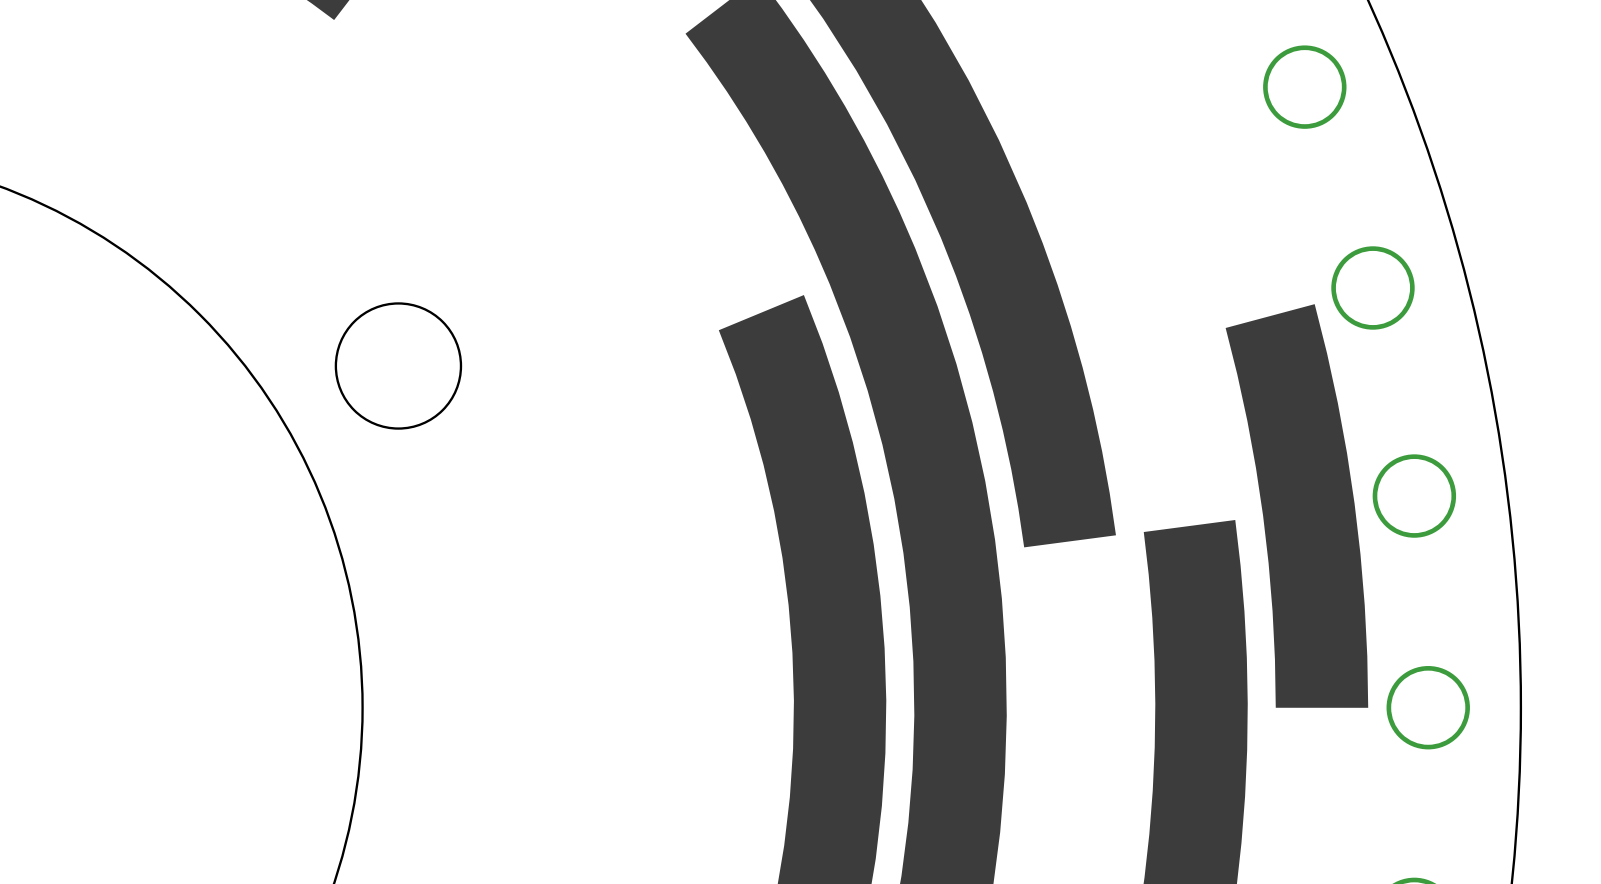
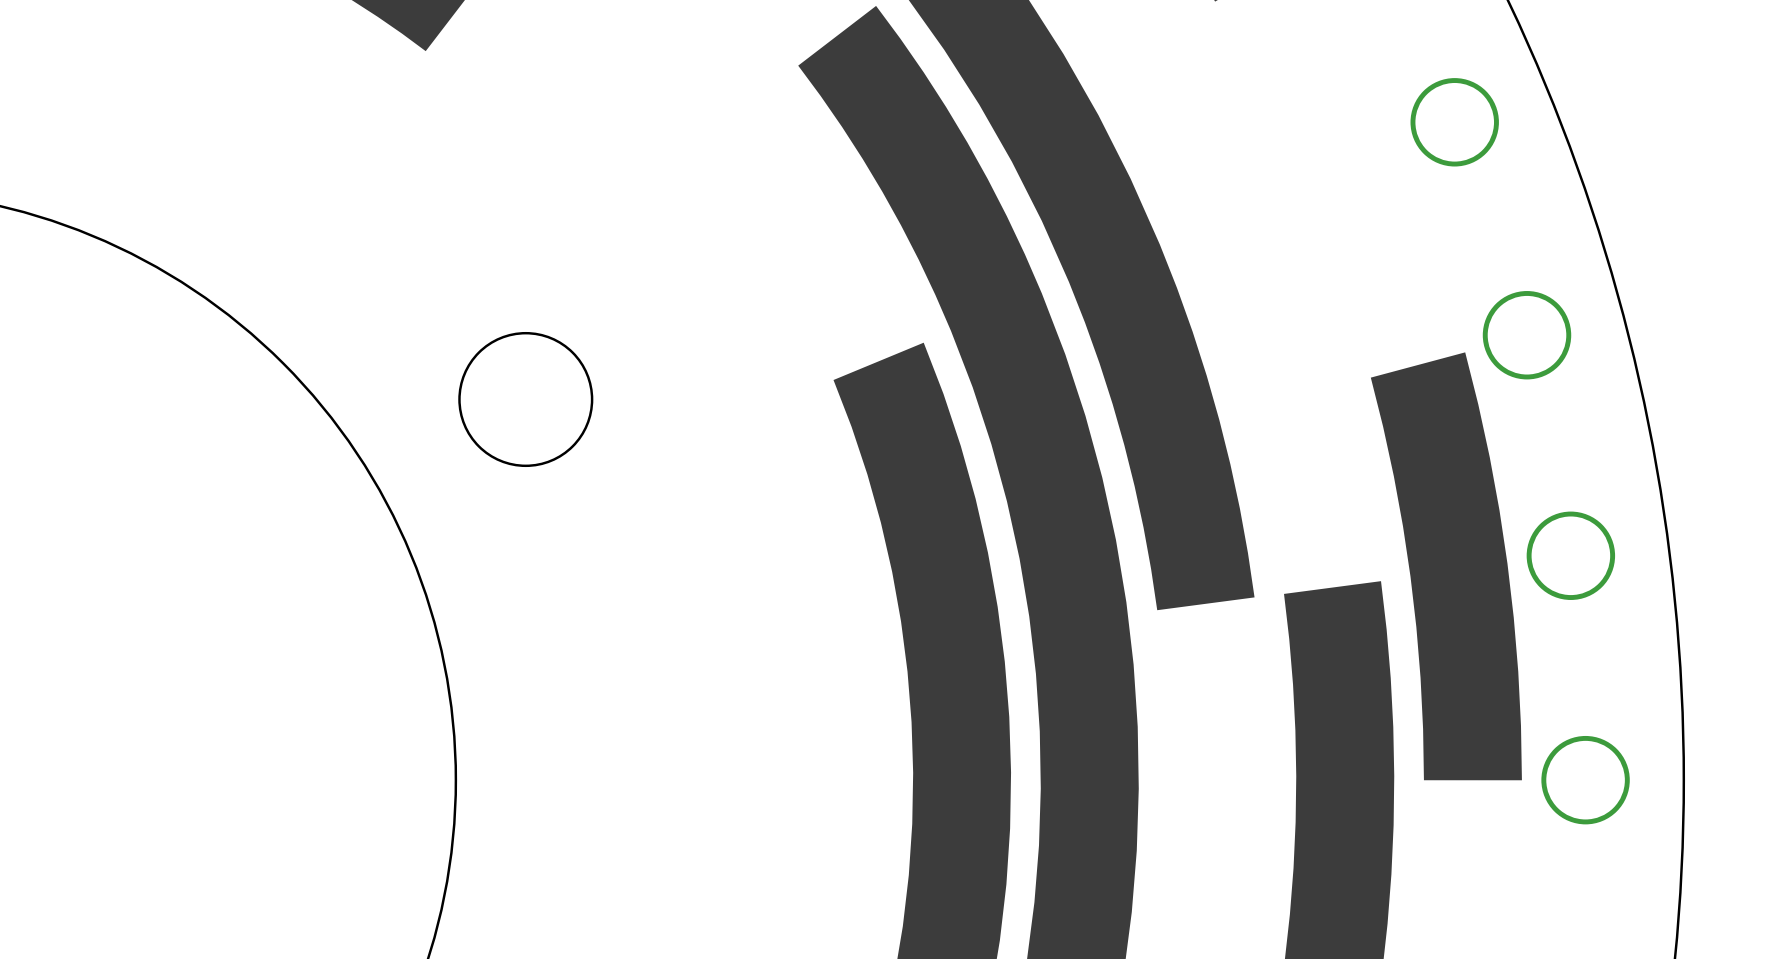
round board edge position: (398, 366) -> (525, 399)

